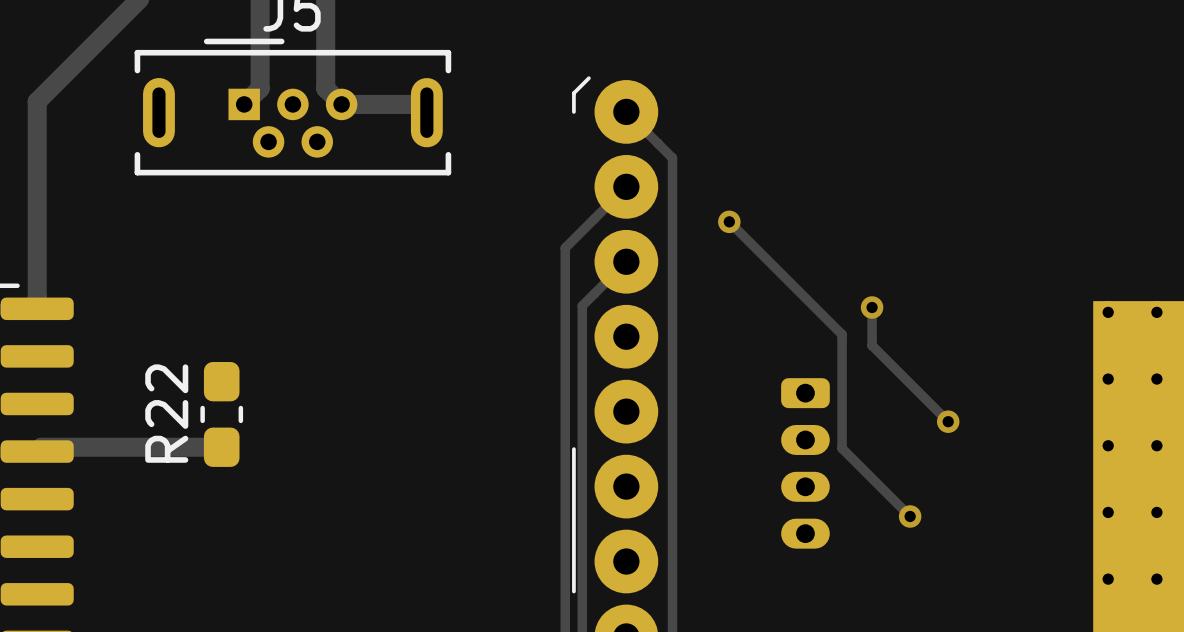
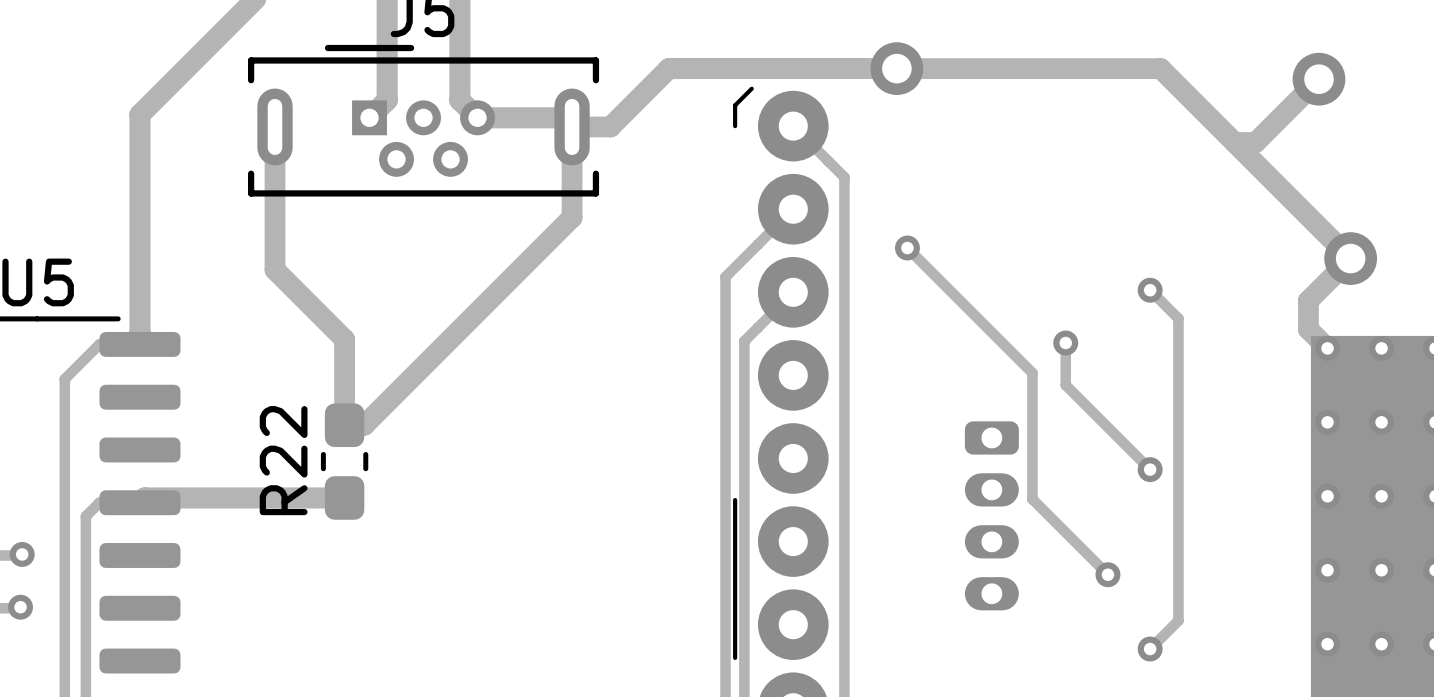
via: none -> (896, 68)
track: none -> (1318, 79) (1255, 142) (1234, 142)
via: none -> (1318, 79)
track: none -> (275, 126) (275, 269) (344, 339) (344, 425) (364, 425) (572, 217) (572, 126) (610, 126) (668, 68) (1160, 68) (1350, 258) (1308, 300) (1308, 329) (1327, 348)
via: none -> (1350, 258)
track: none -> (1150, 290) (1178, 318) (1178, 620) (1150, 649)
via: none -> (1150, 290)
via: none -> (1150, 649)

